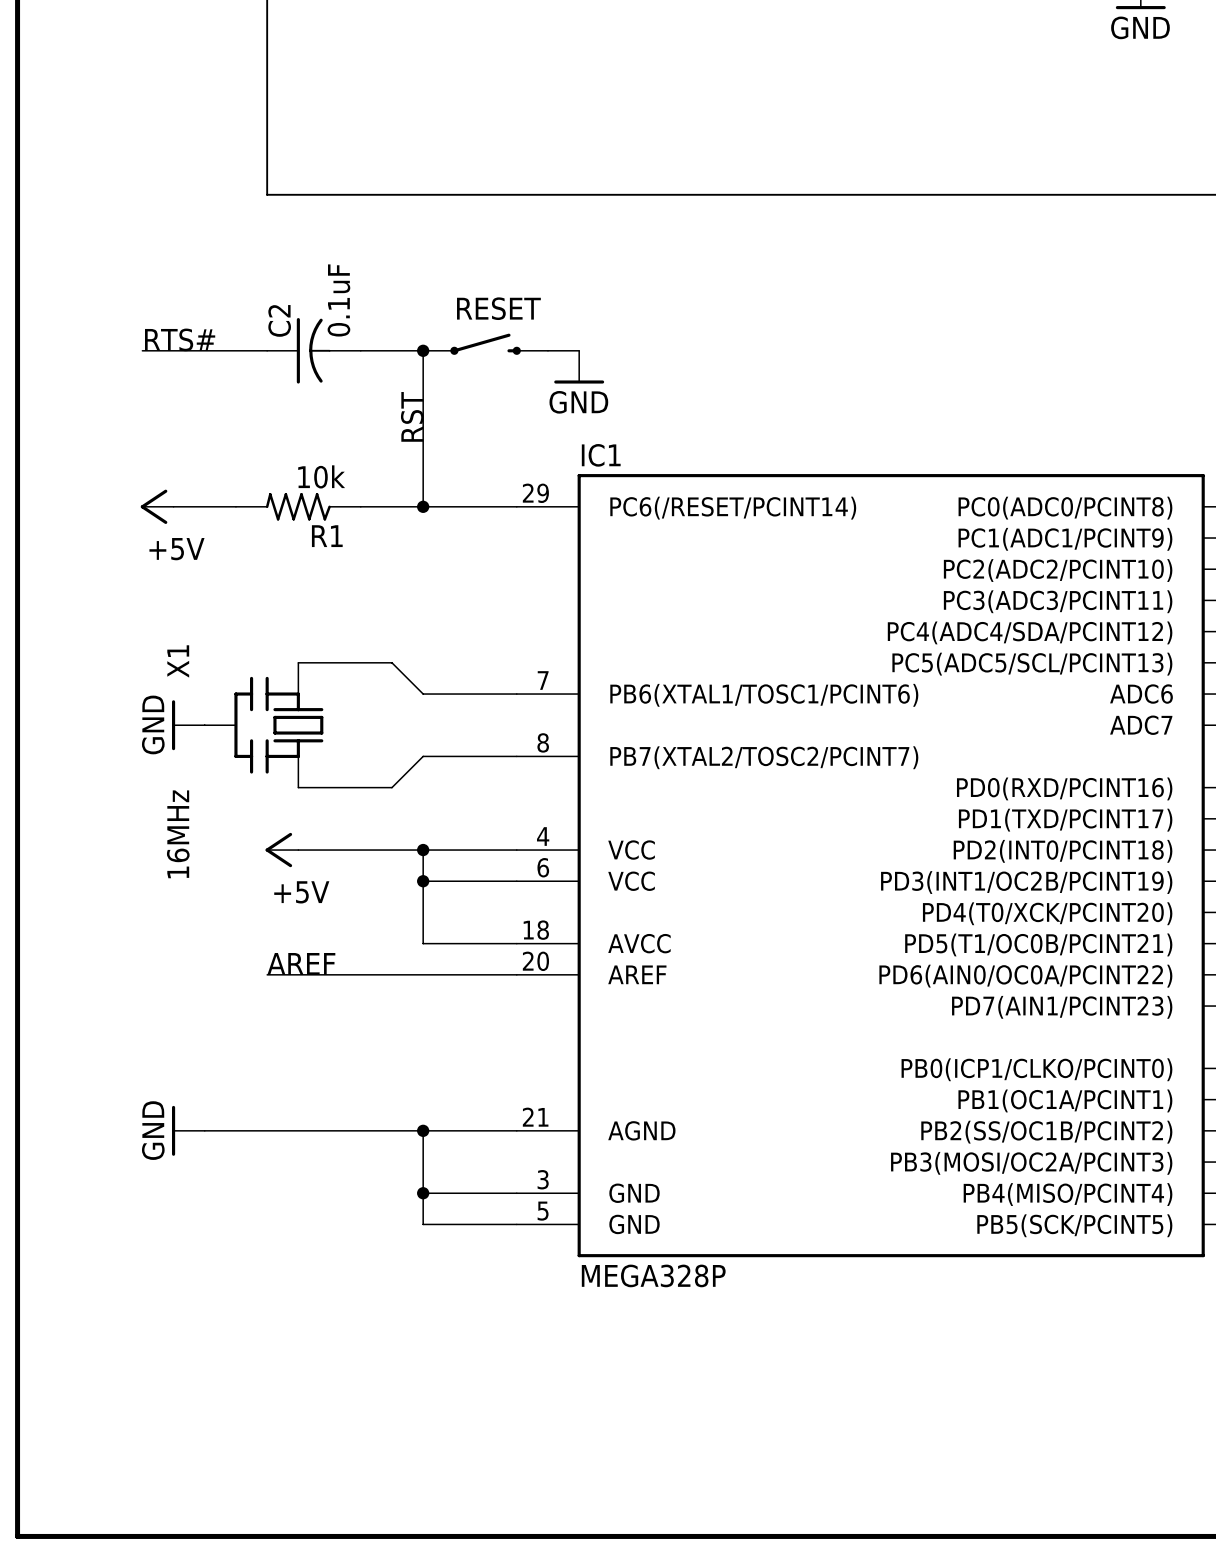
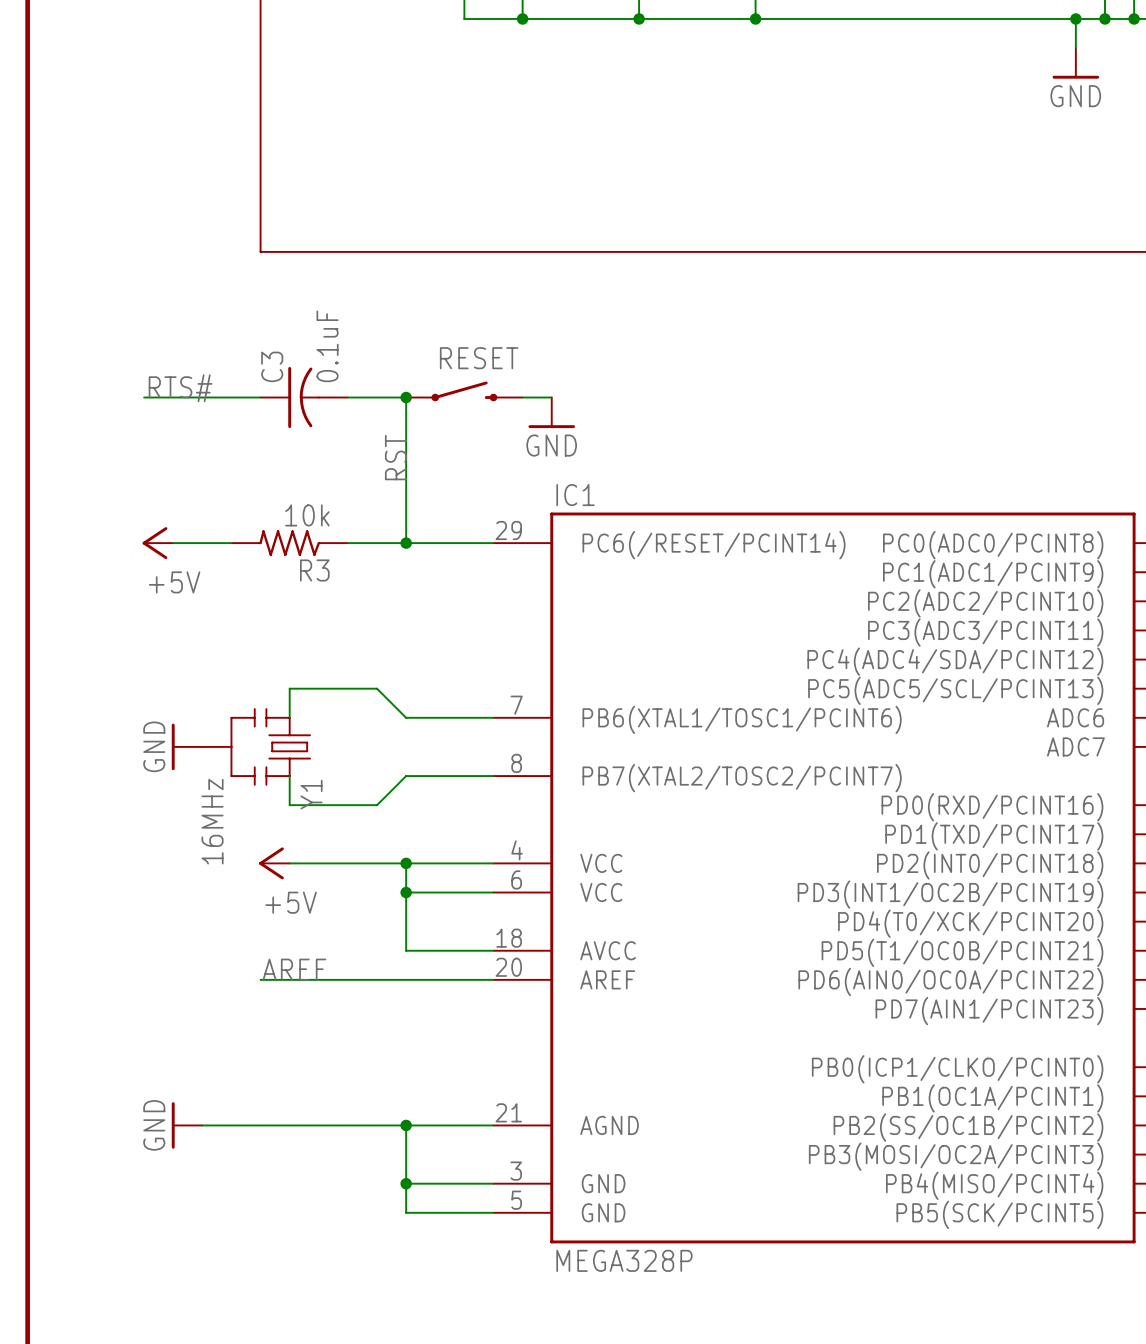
C2 name: C2 (279, 320) -> C3 (272, 366)
R1 name: R1 (327, 536) -> R3 (314, 570)
Y1: none -> 16MHz (256, 746)
X1: 16MHz (264, 725) -> none

